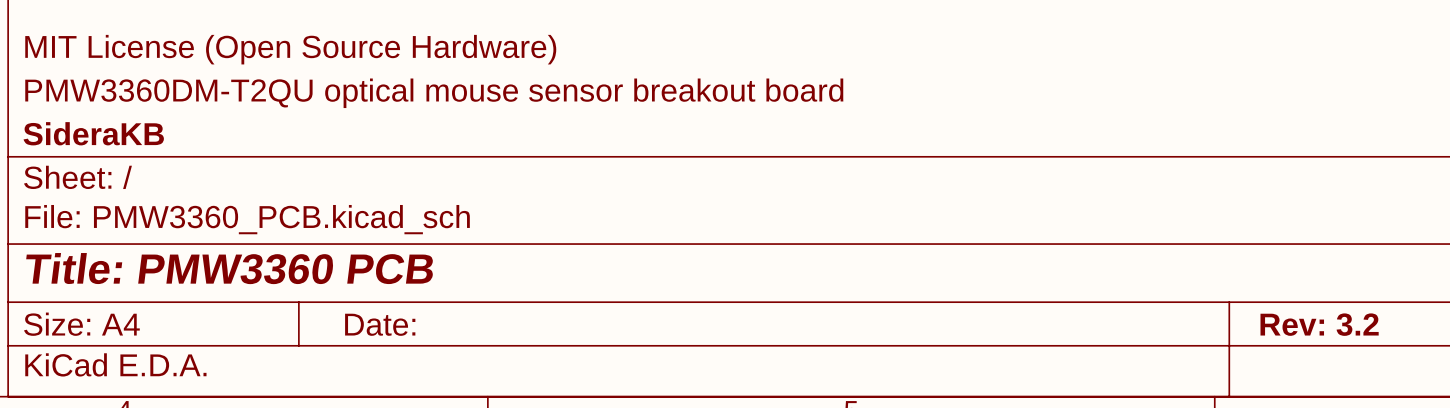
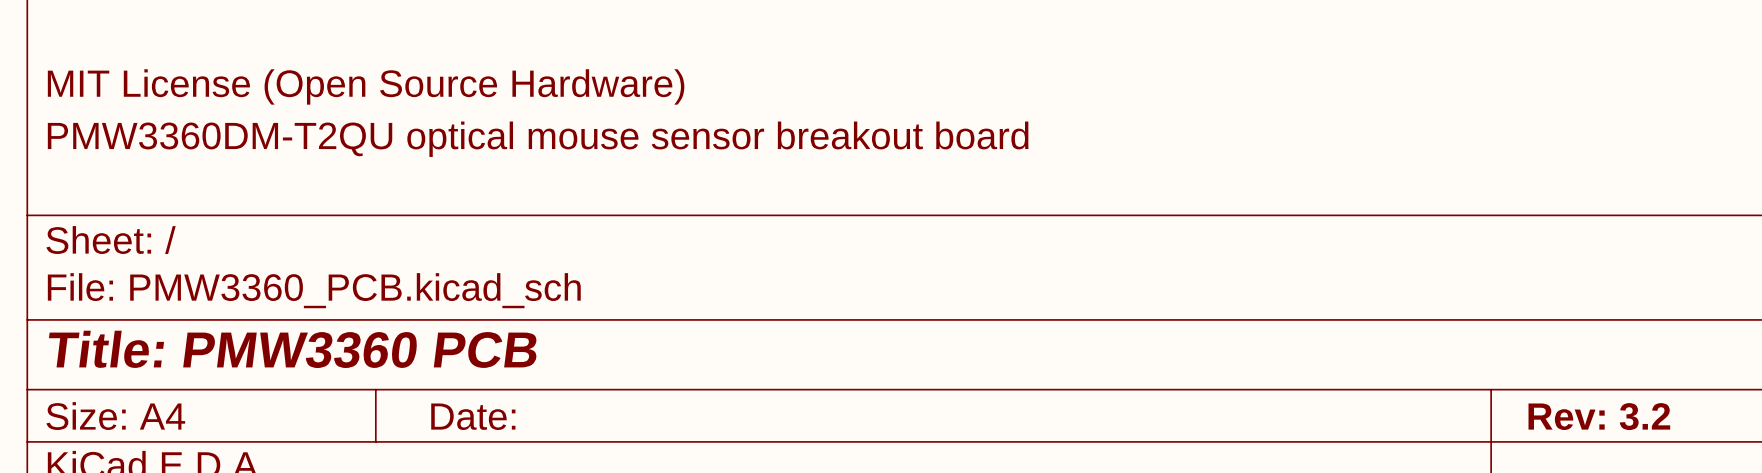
title block: SideraKB (93, 133) -> none

